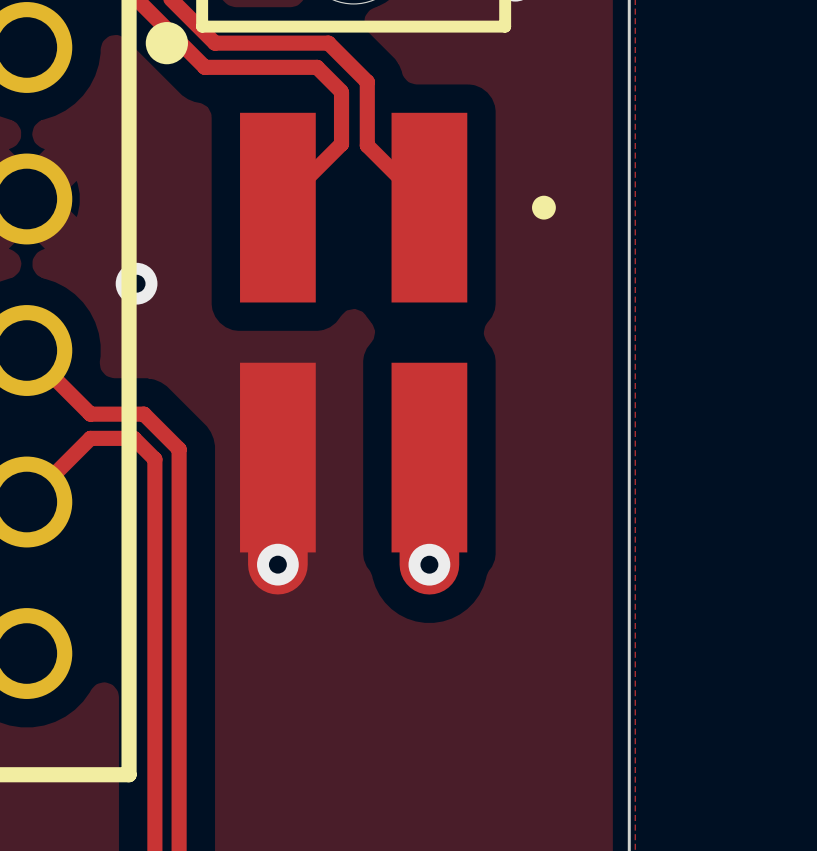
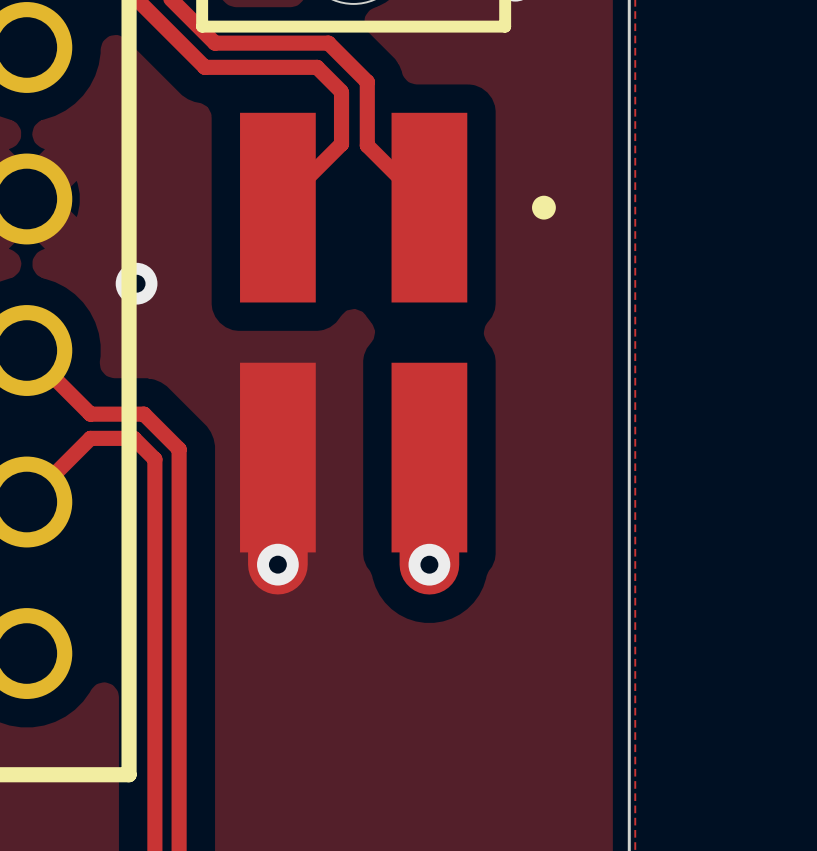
drawing: [145, 22, 188, 65] -> none

